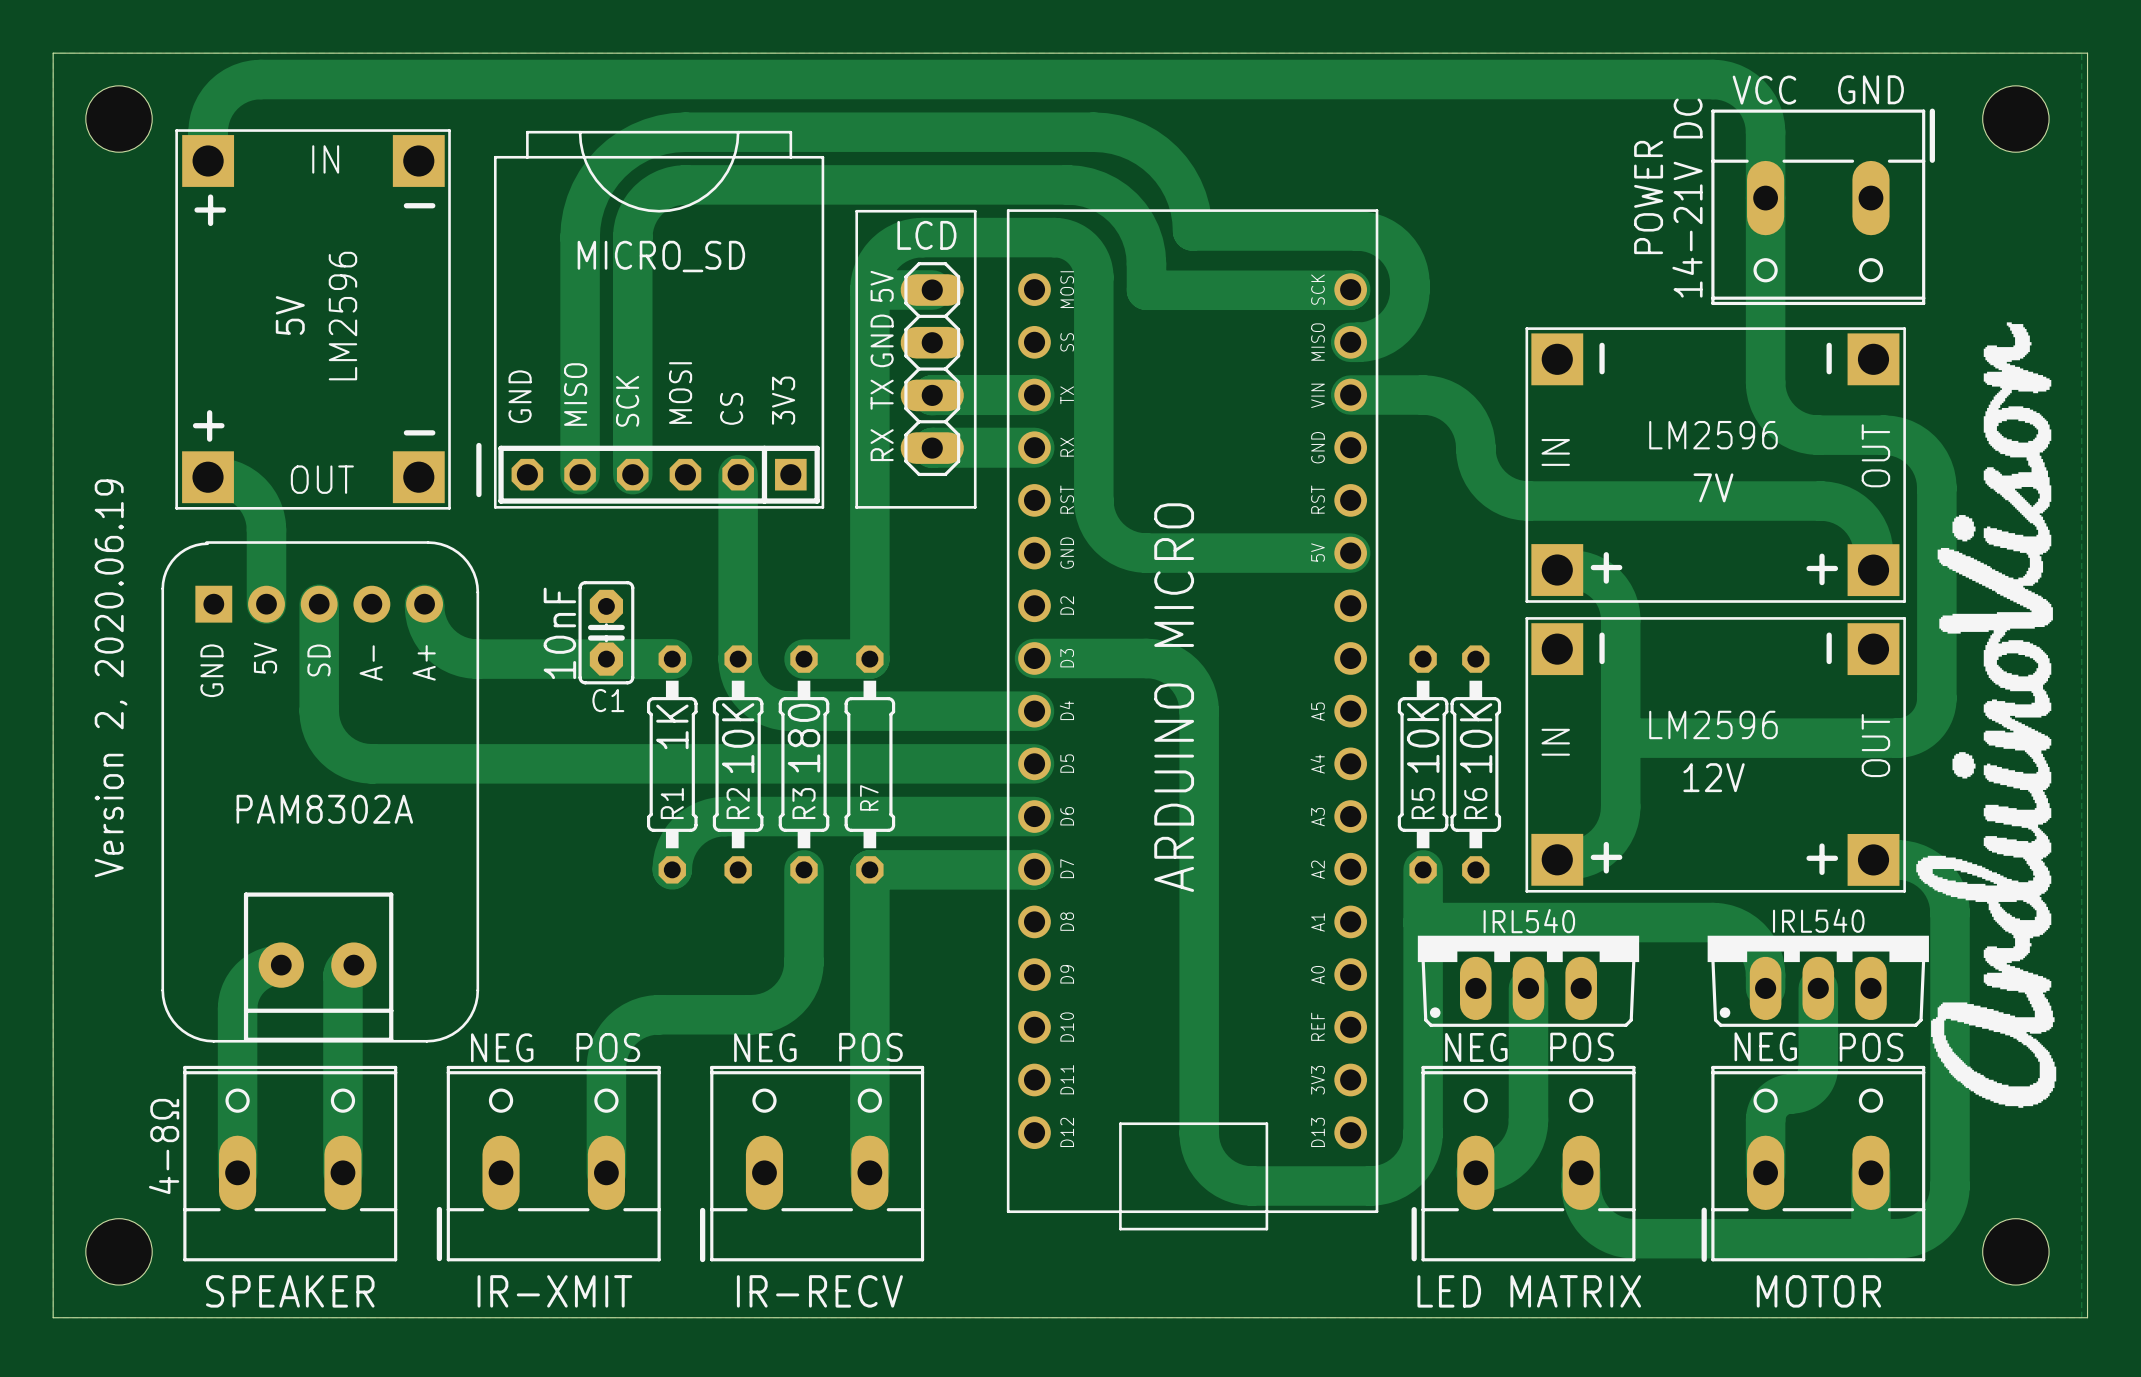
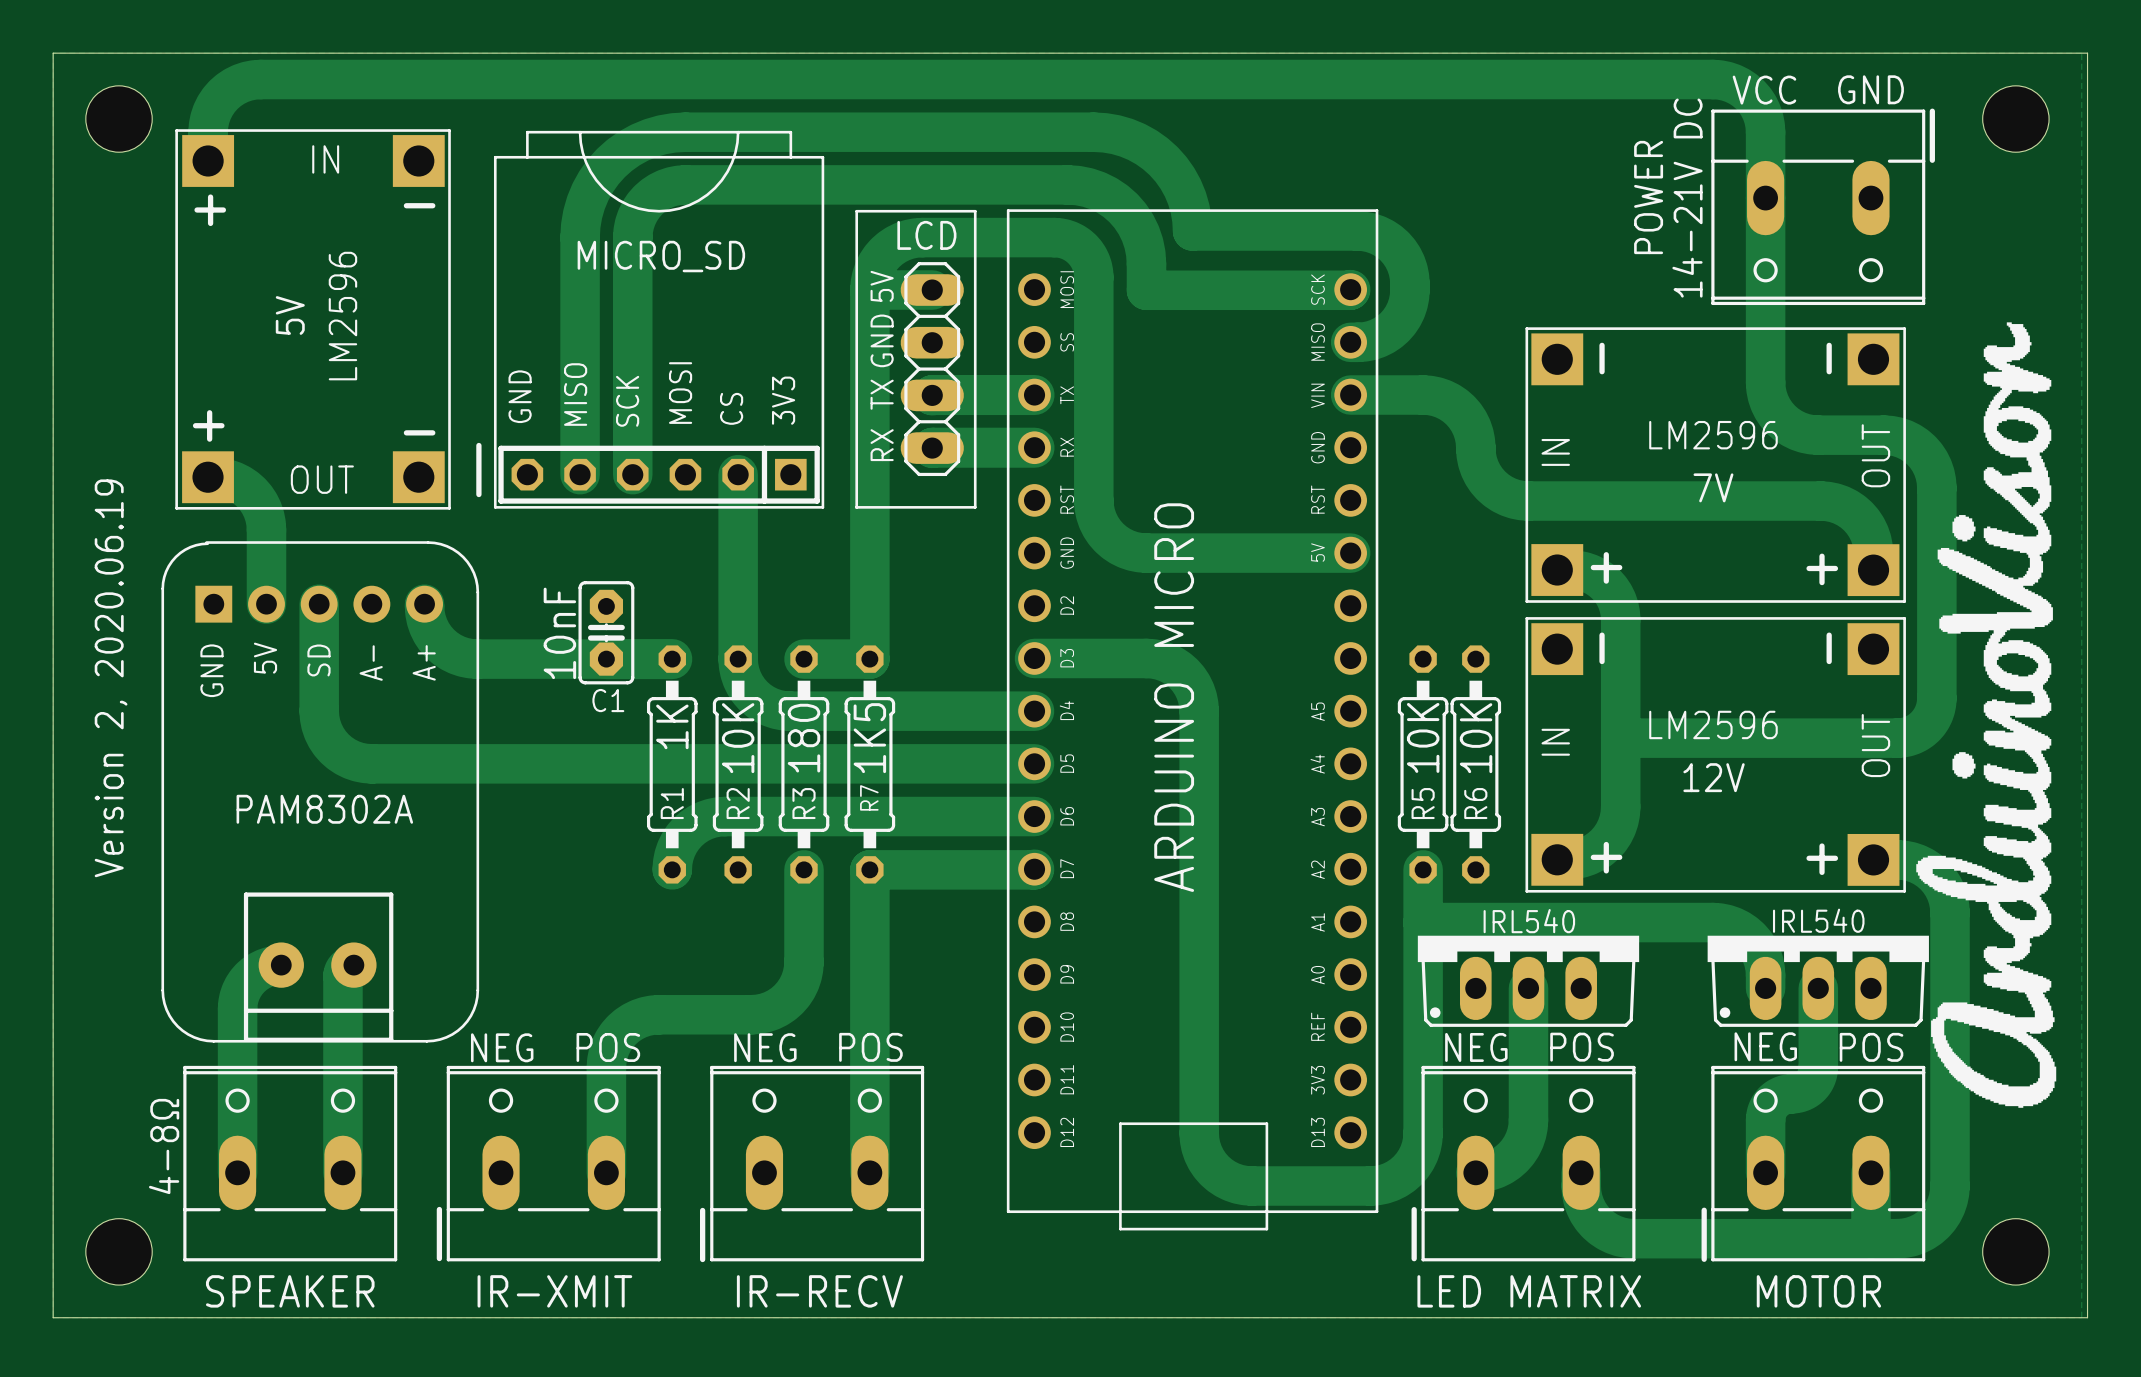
R7 value: none -> 1K5 (869, 738)

